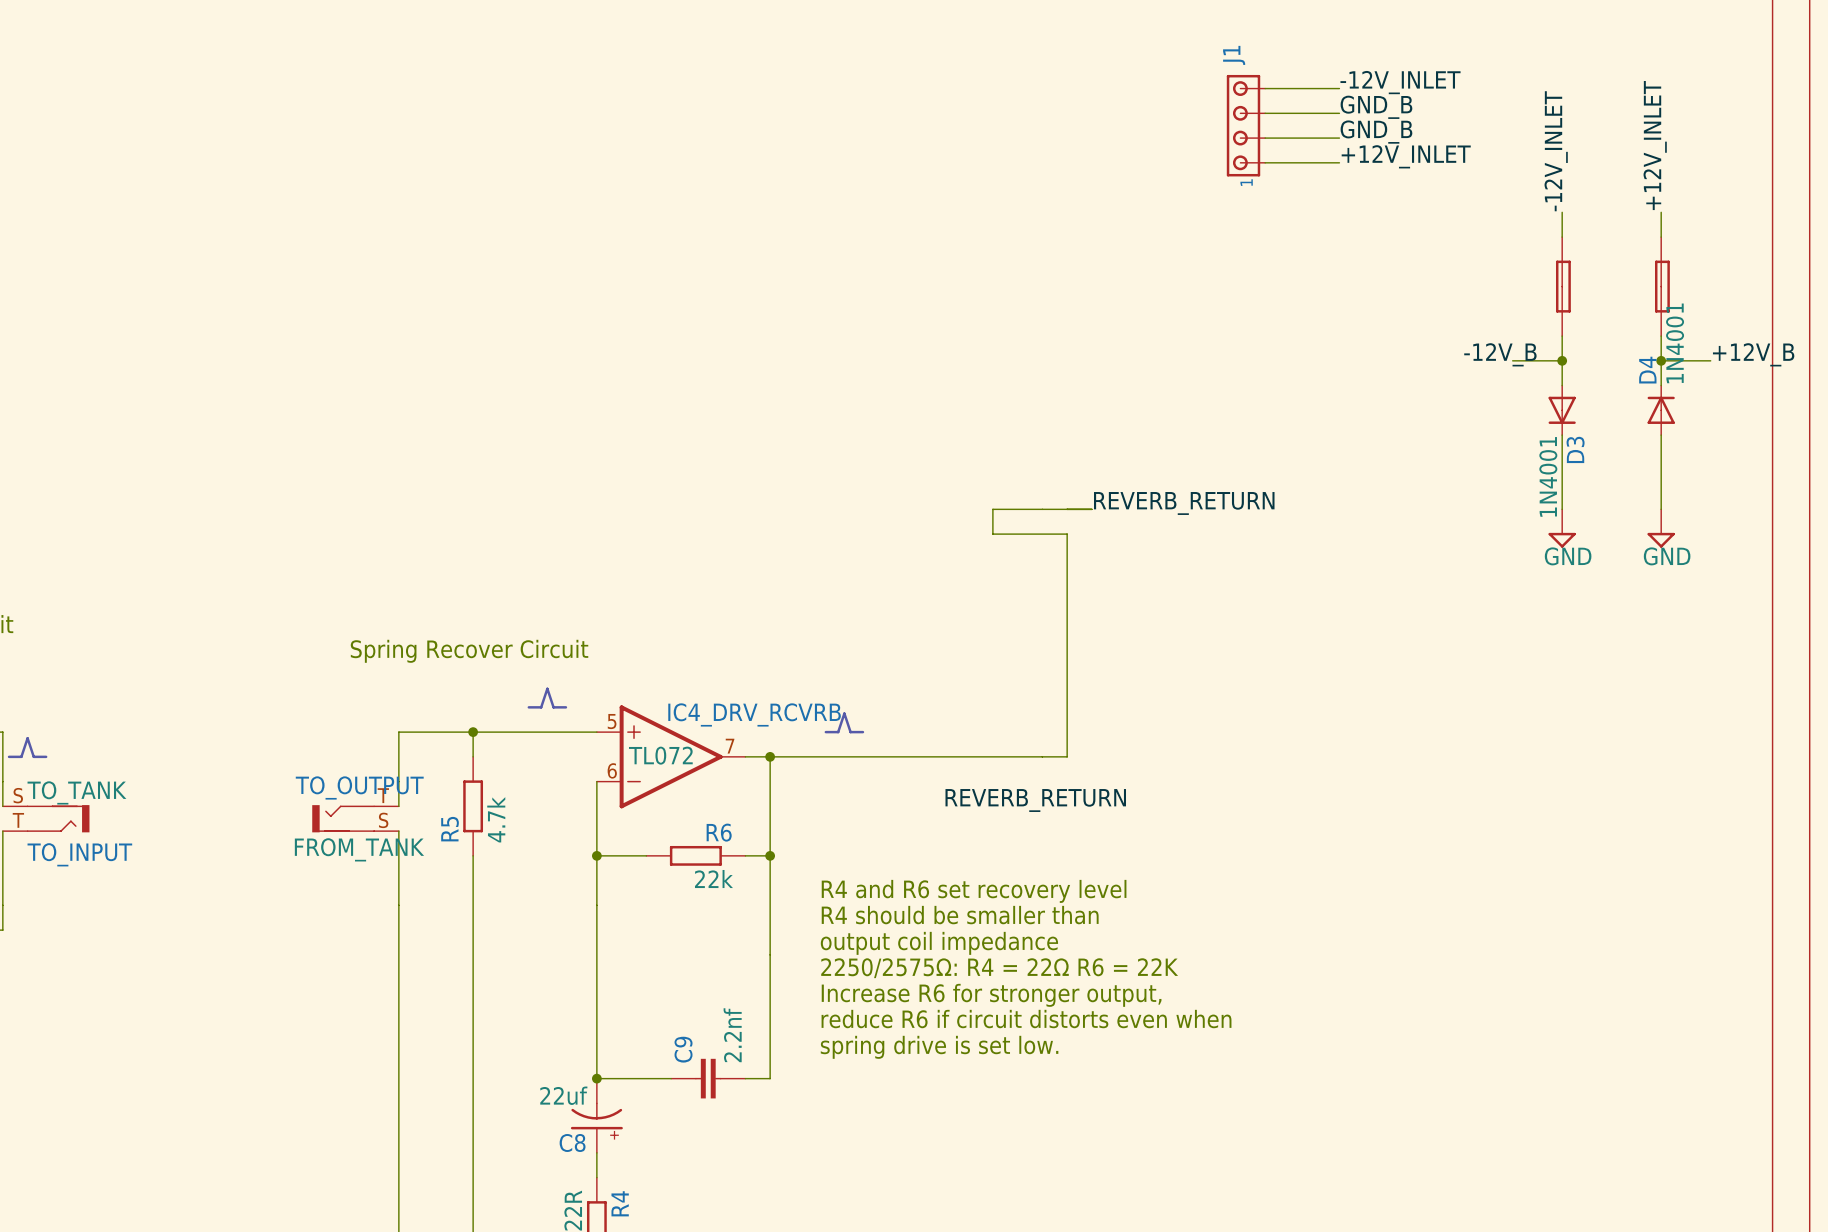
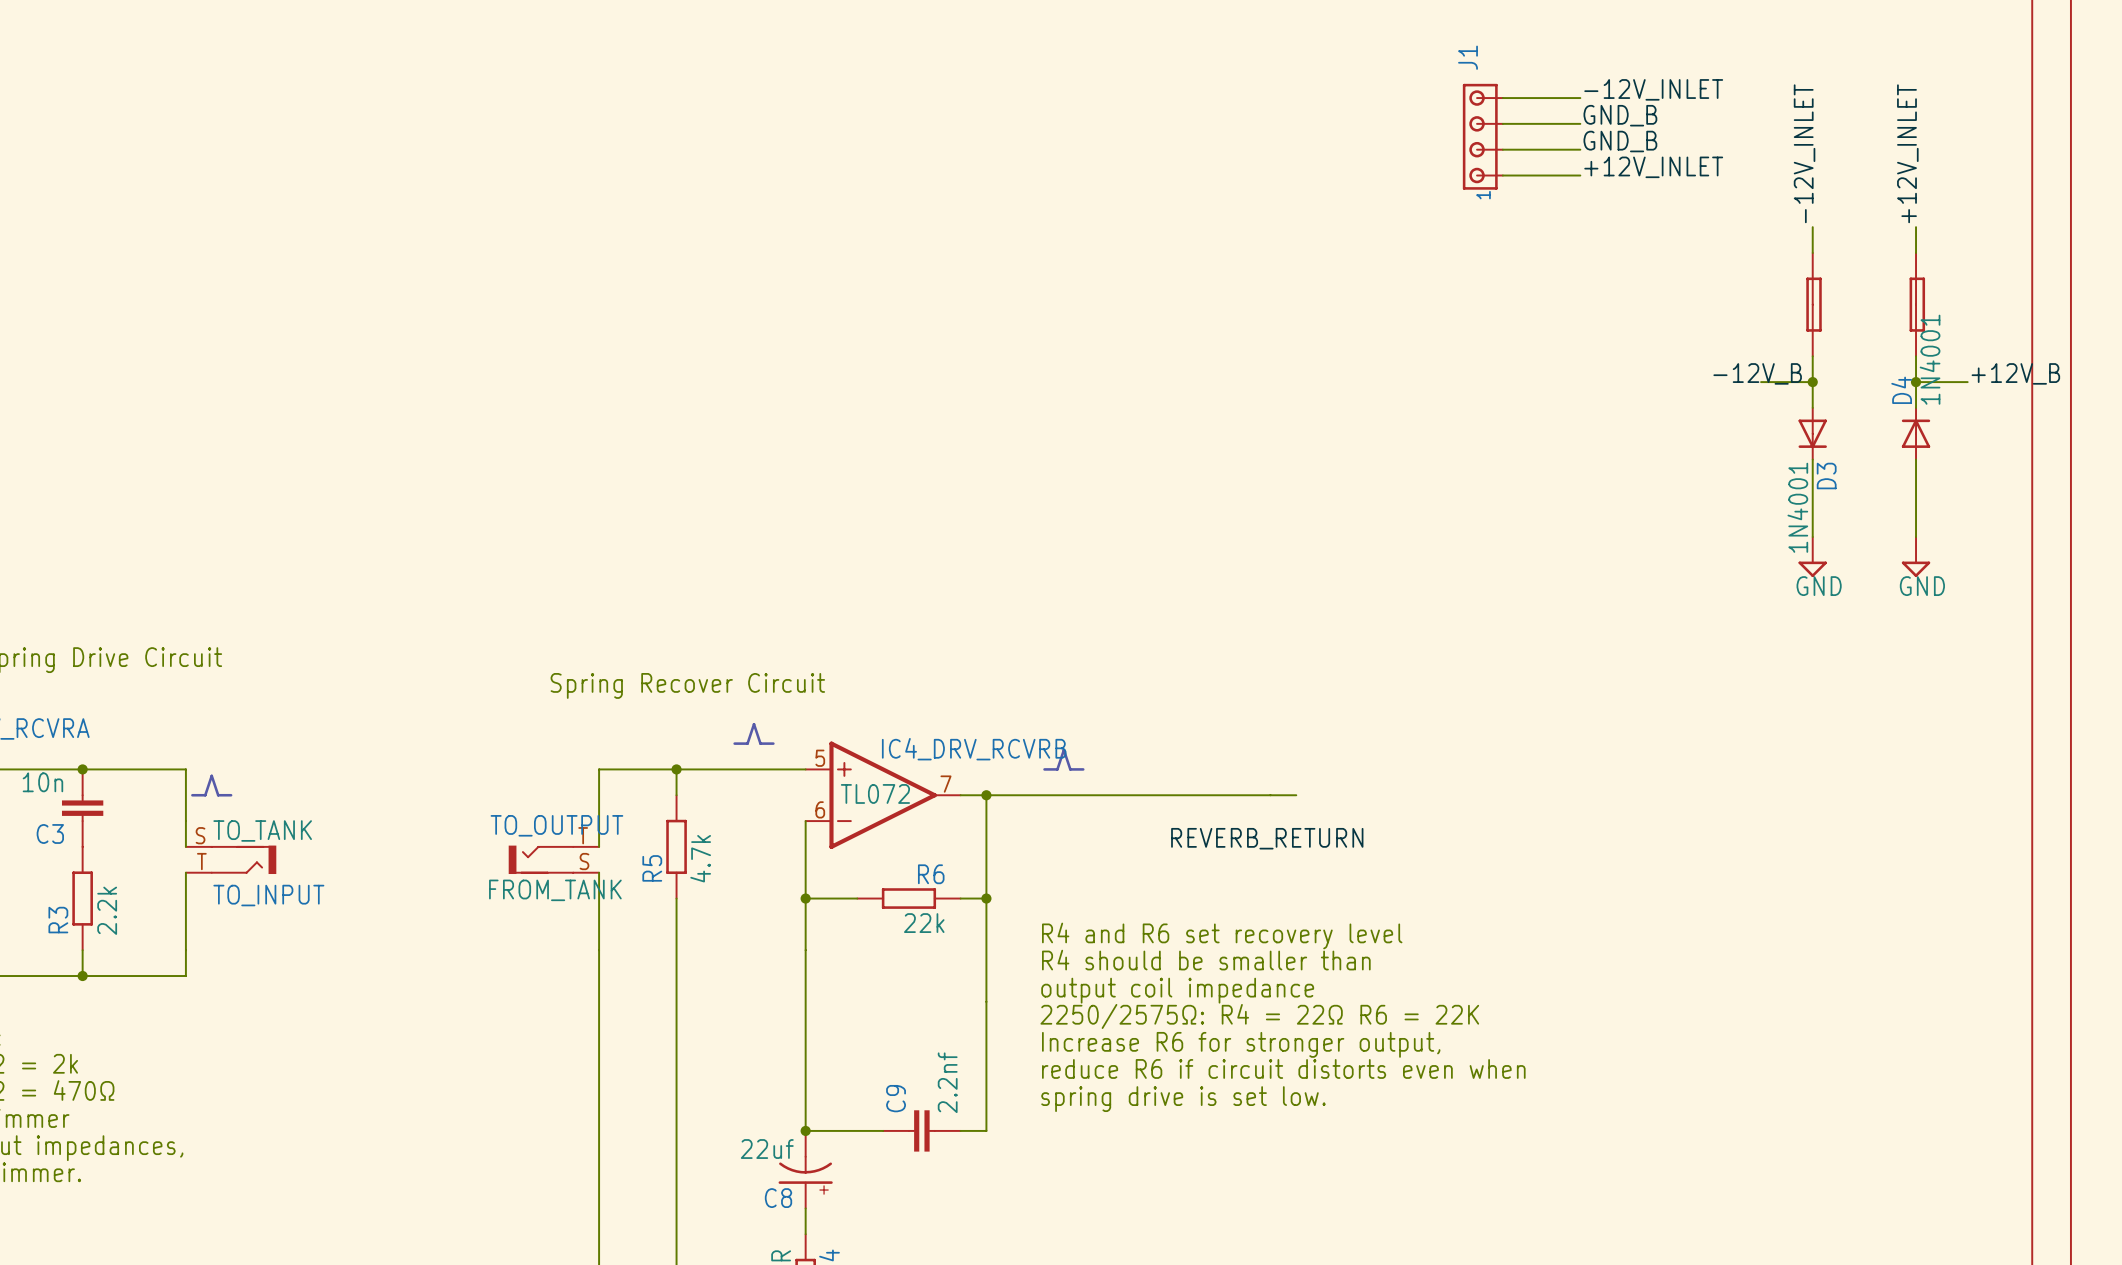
label: REVERB_RETURN (1184, 503) -> none
wire: (1091, 509) (992, 509) (992, 534) (1067, 534) (1067, 756) -> none

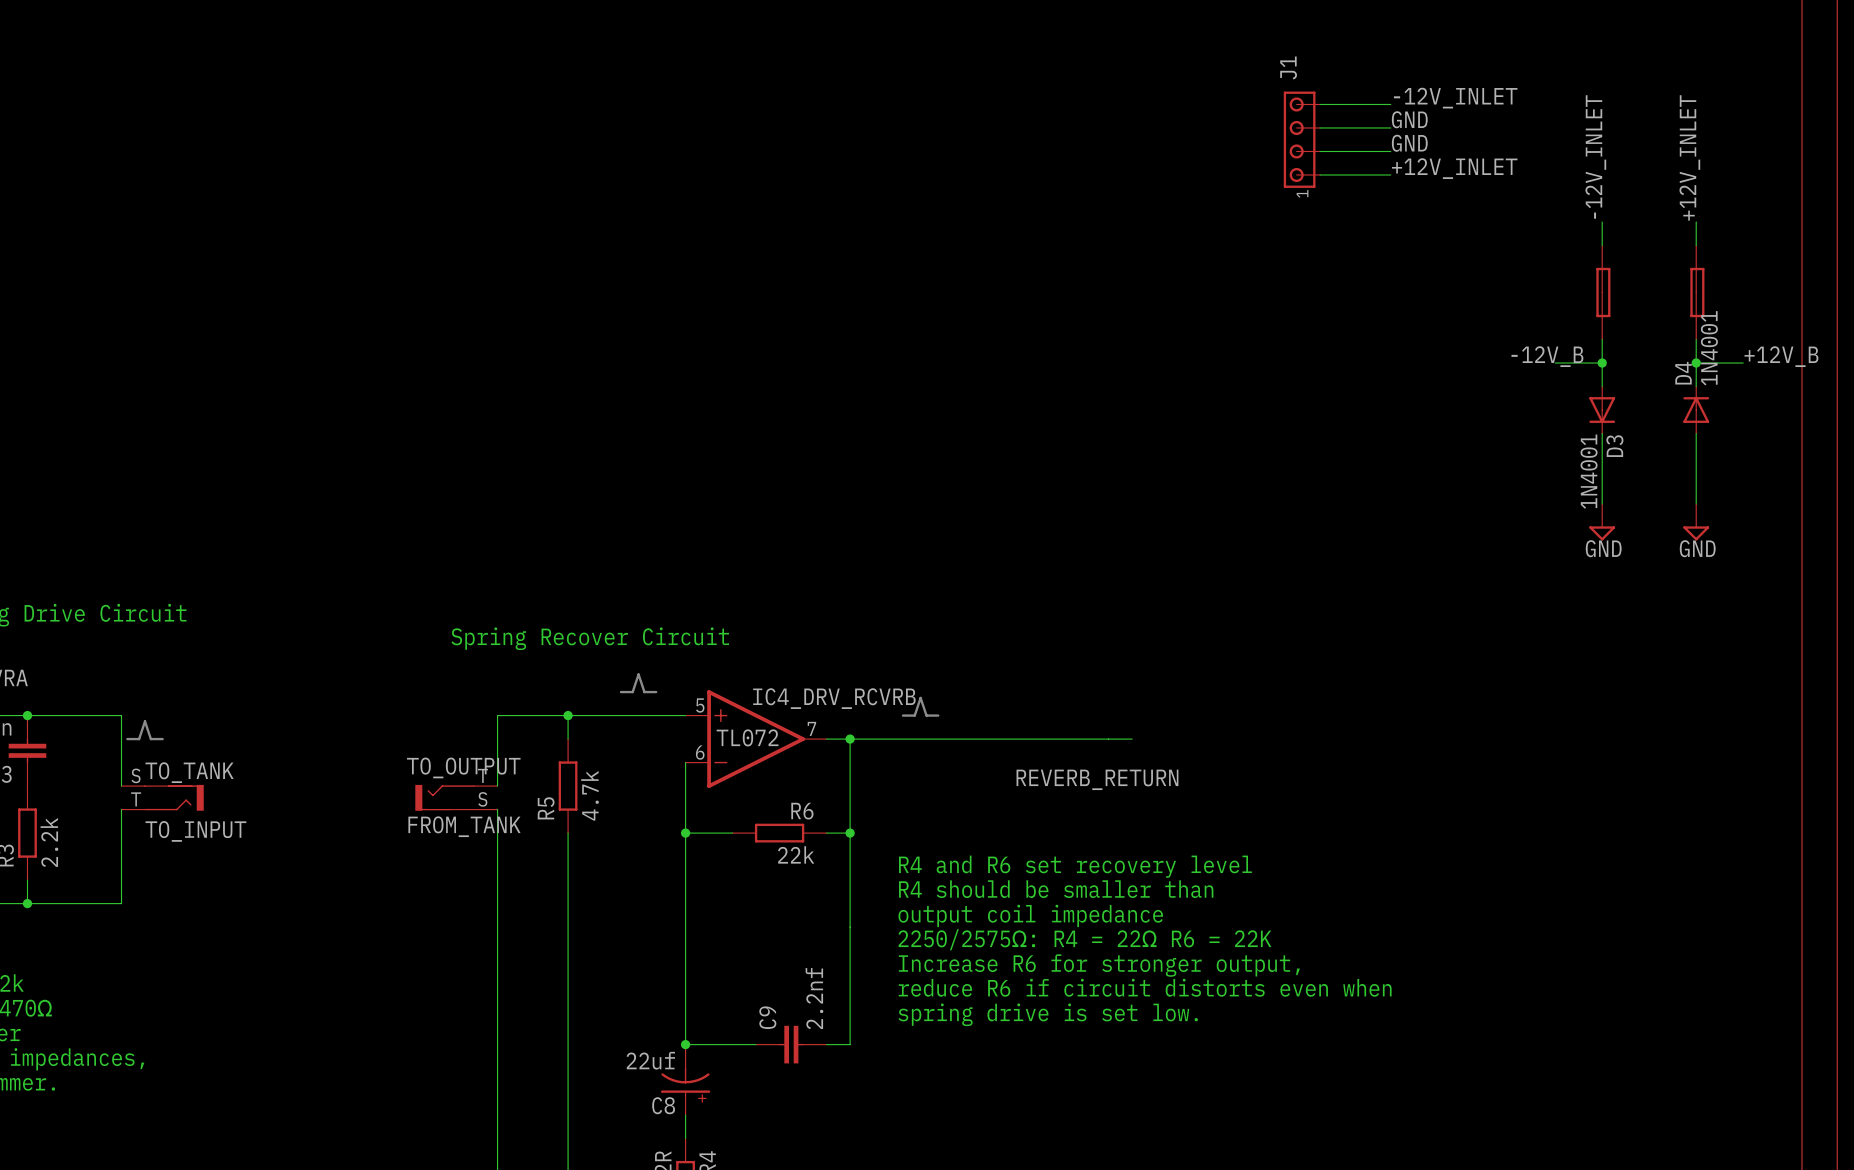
label: GND_B (1620, 115) -> GND (1409, 119)
label: GND_B (1620, 141) -> GND (1409, 143)

